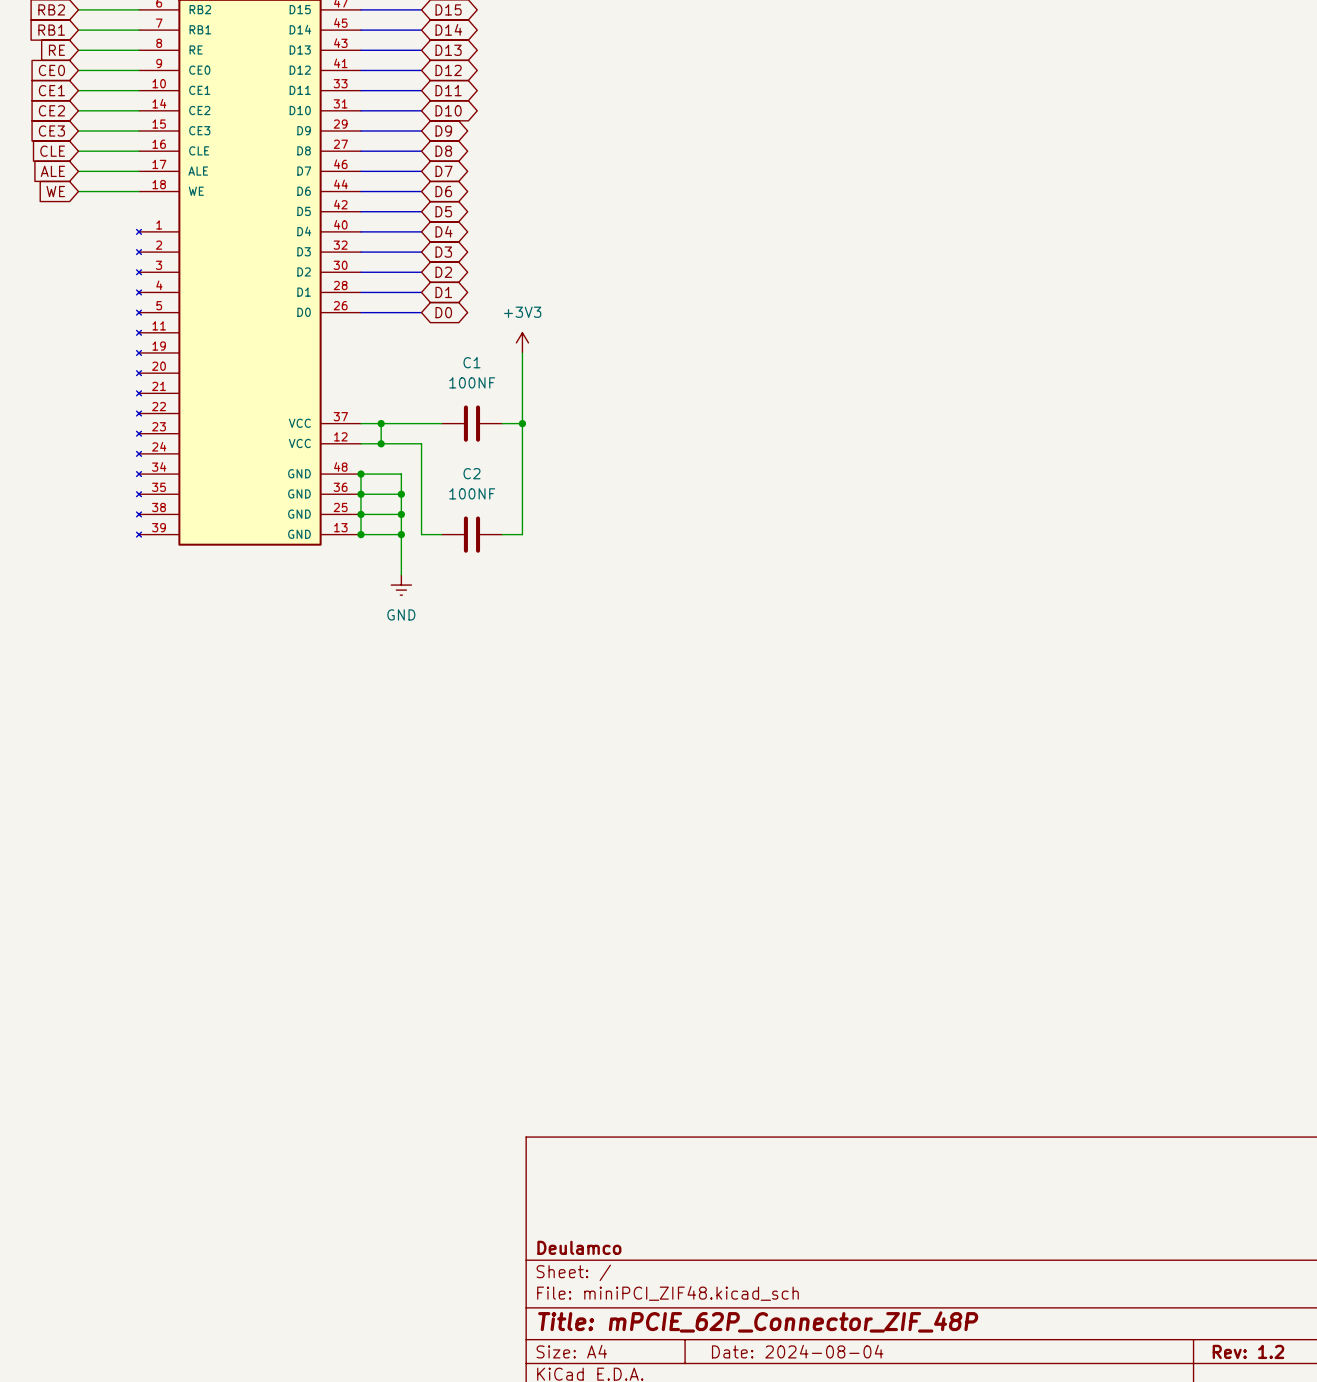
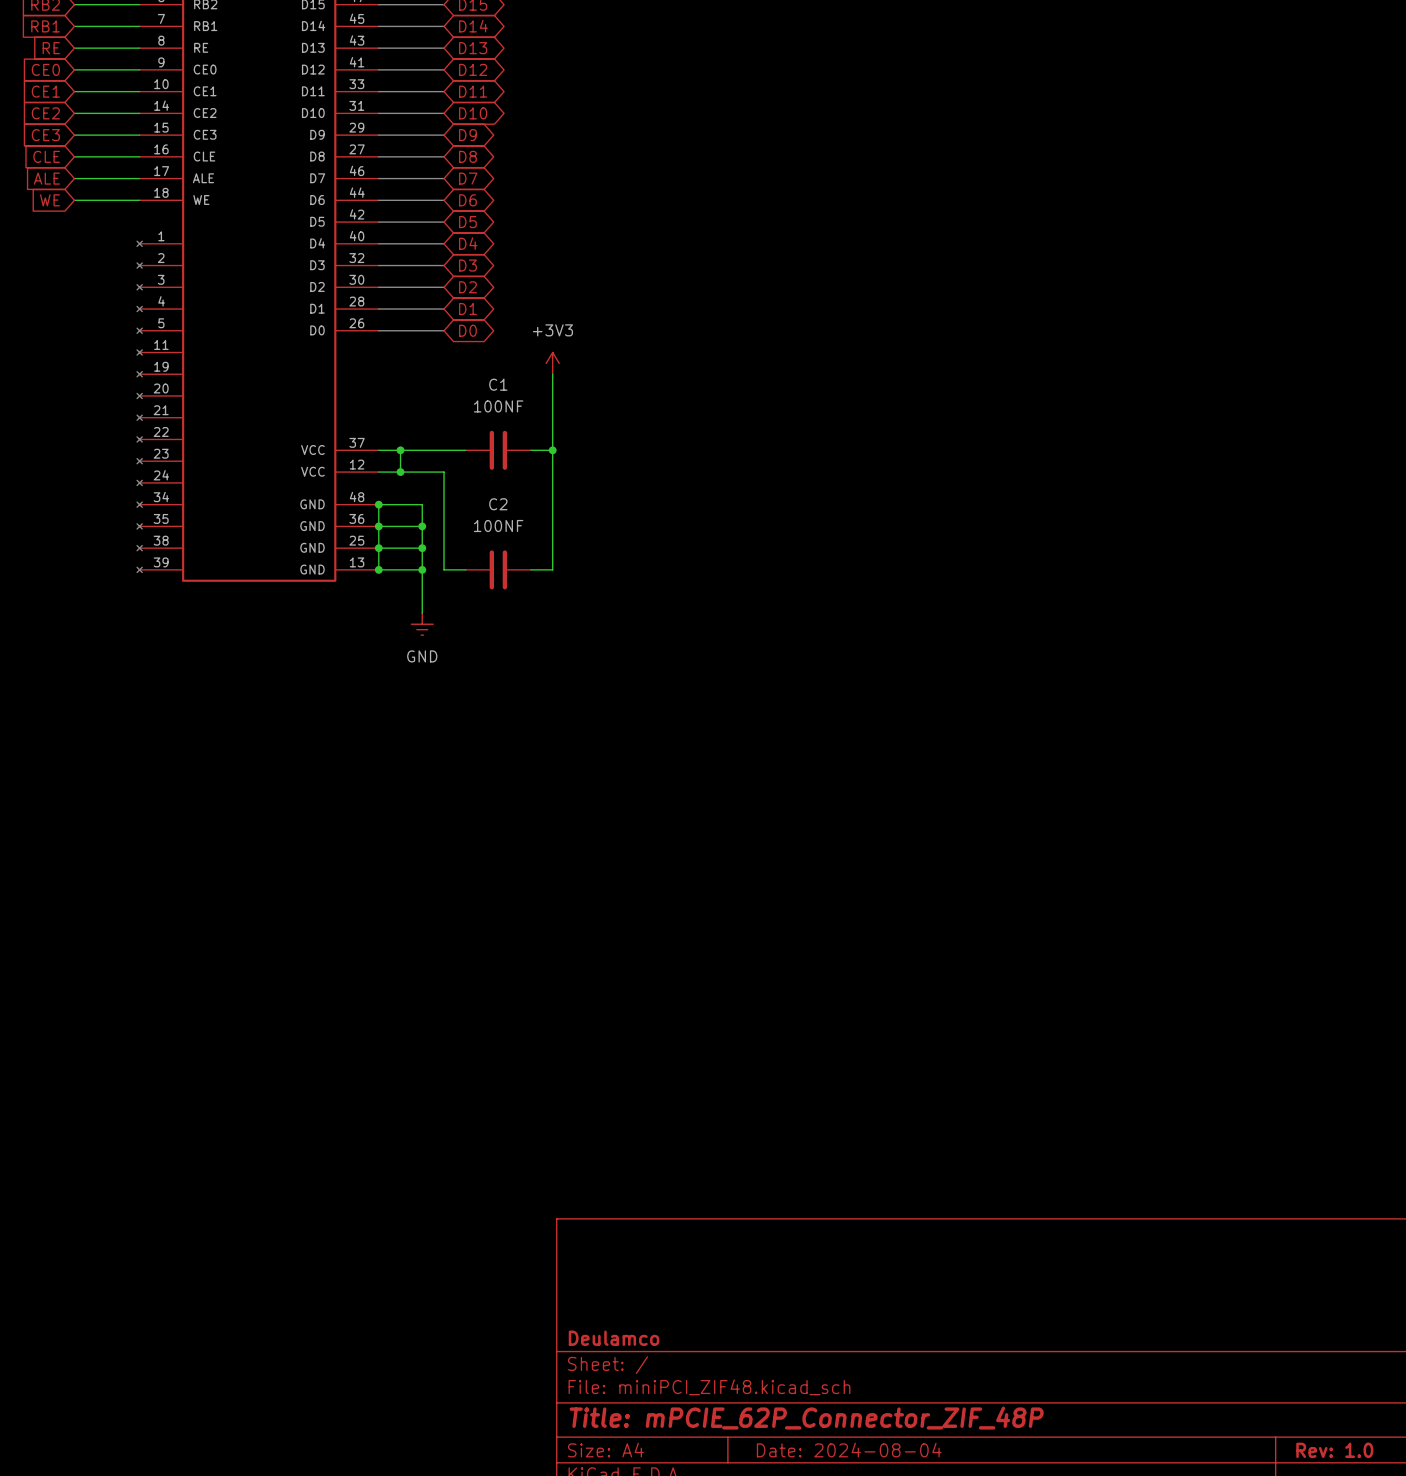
title block: Rev: 1.2 (1248, 1351) -> Rev: 1.0 (1334, 1450)

